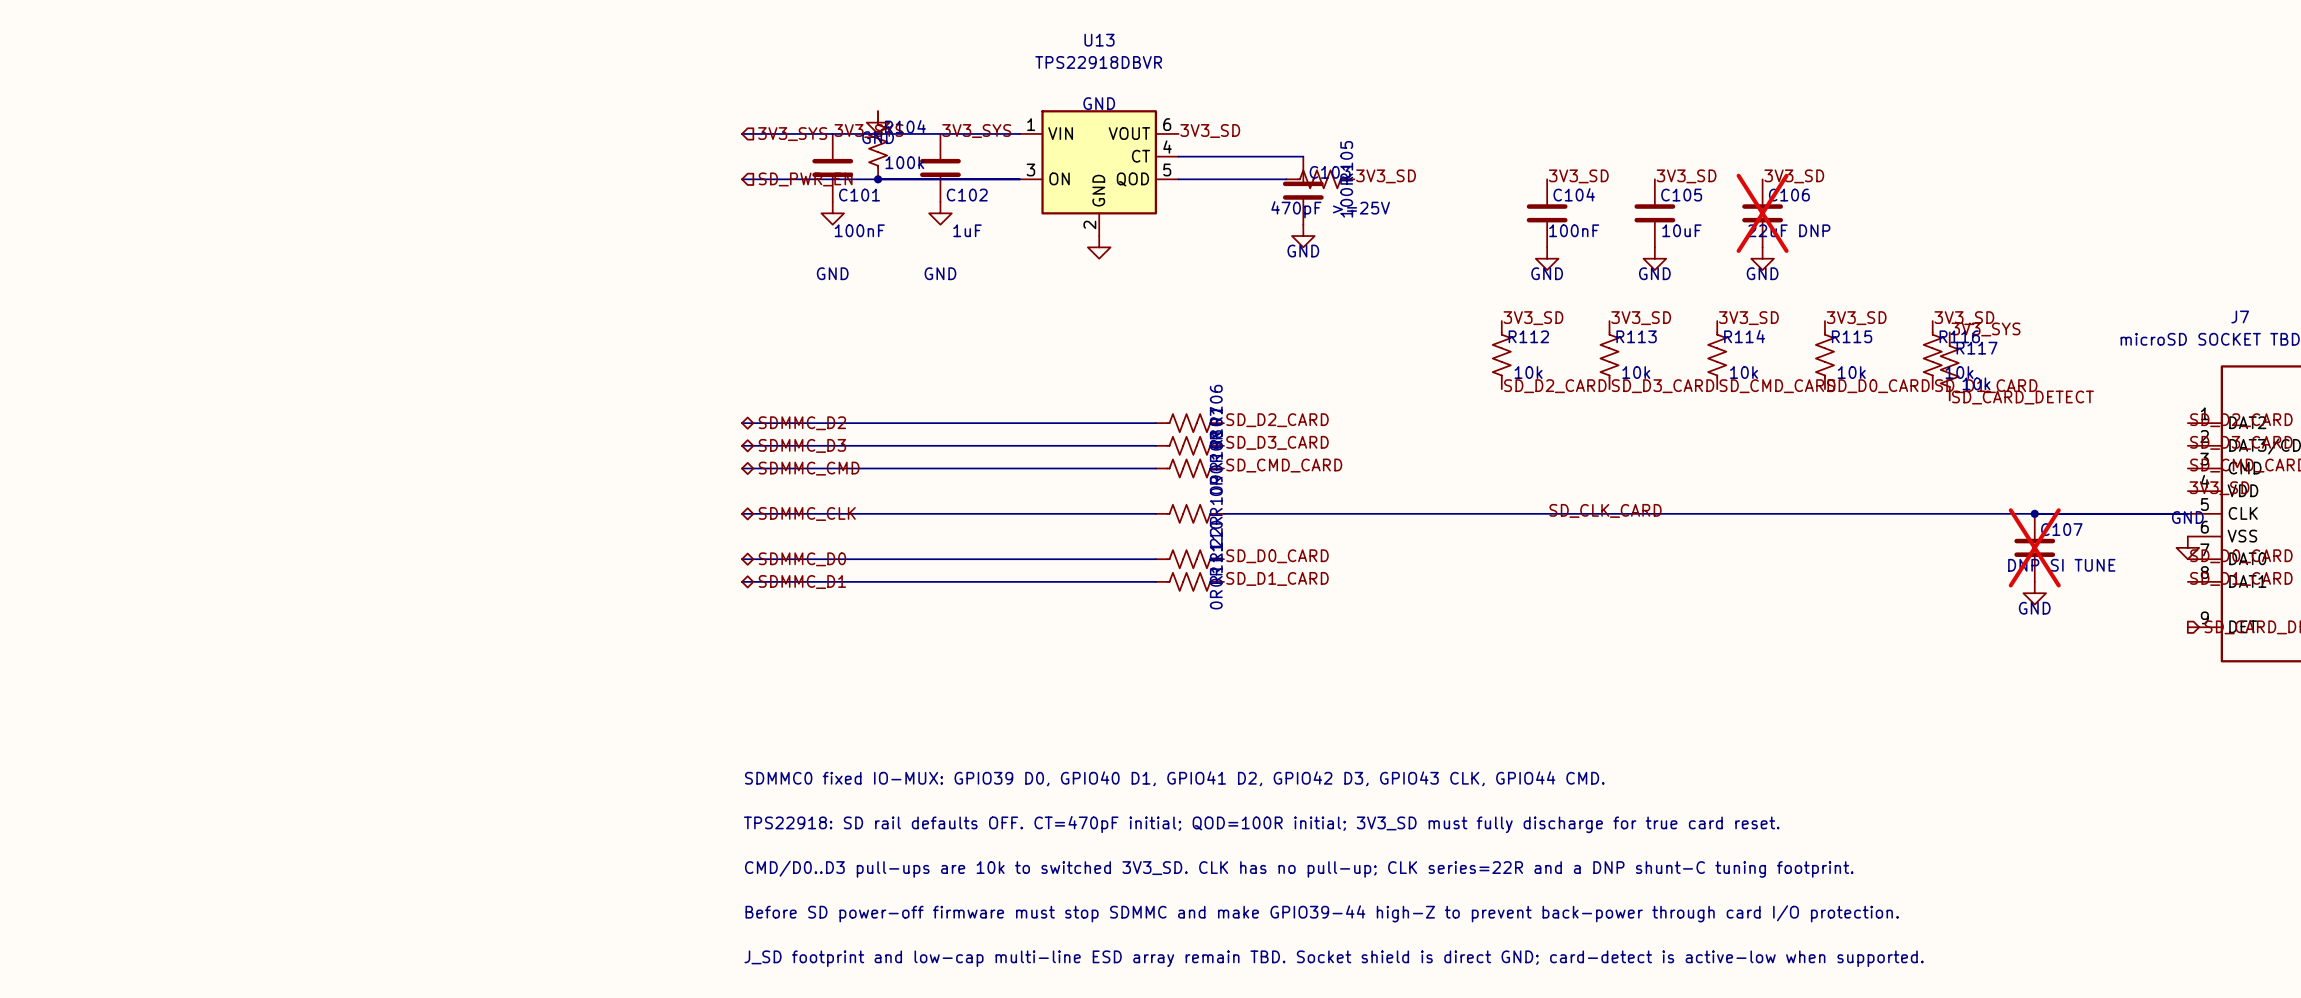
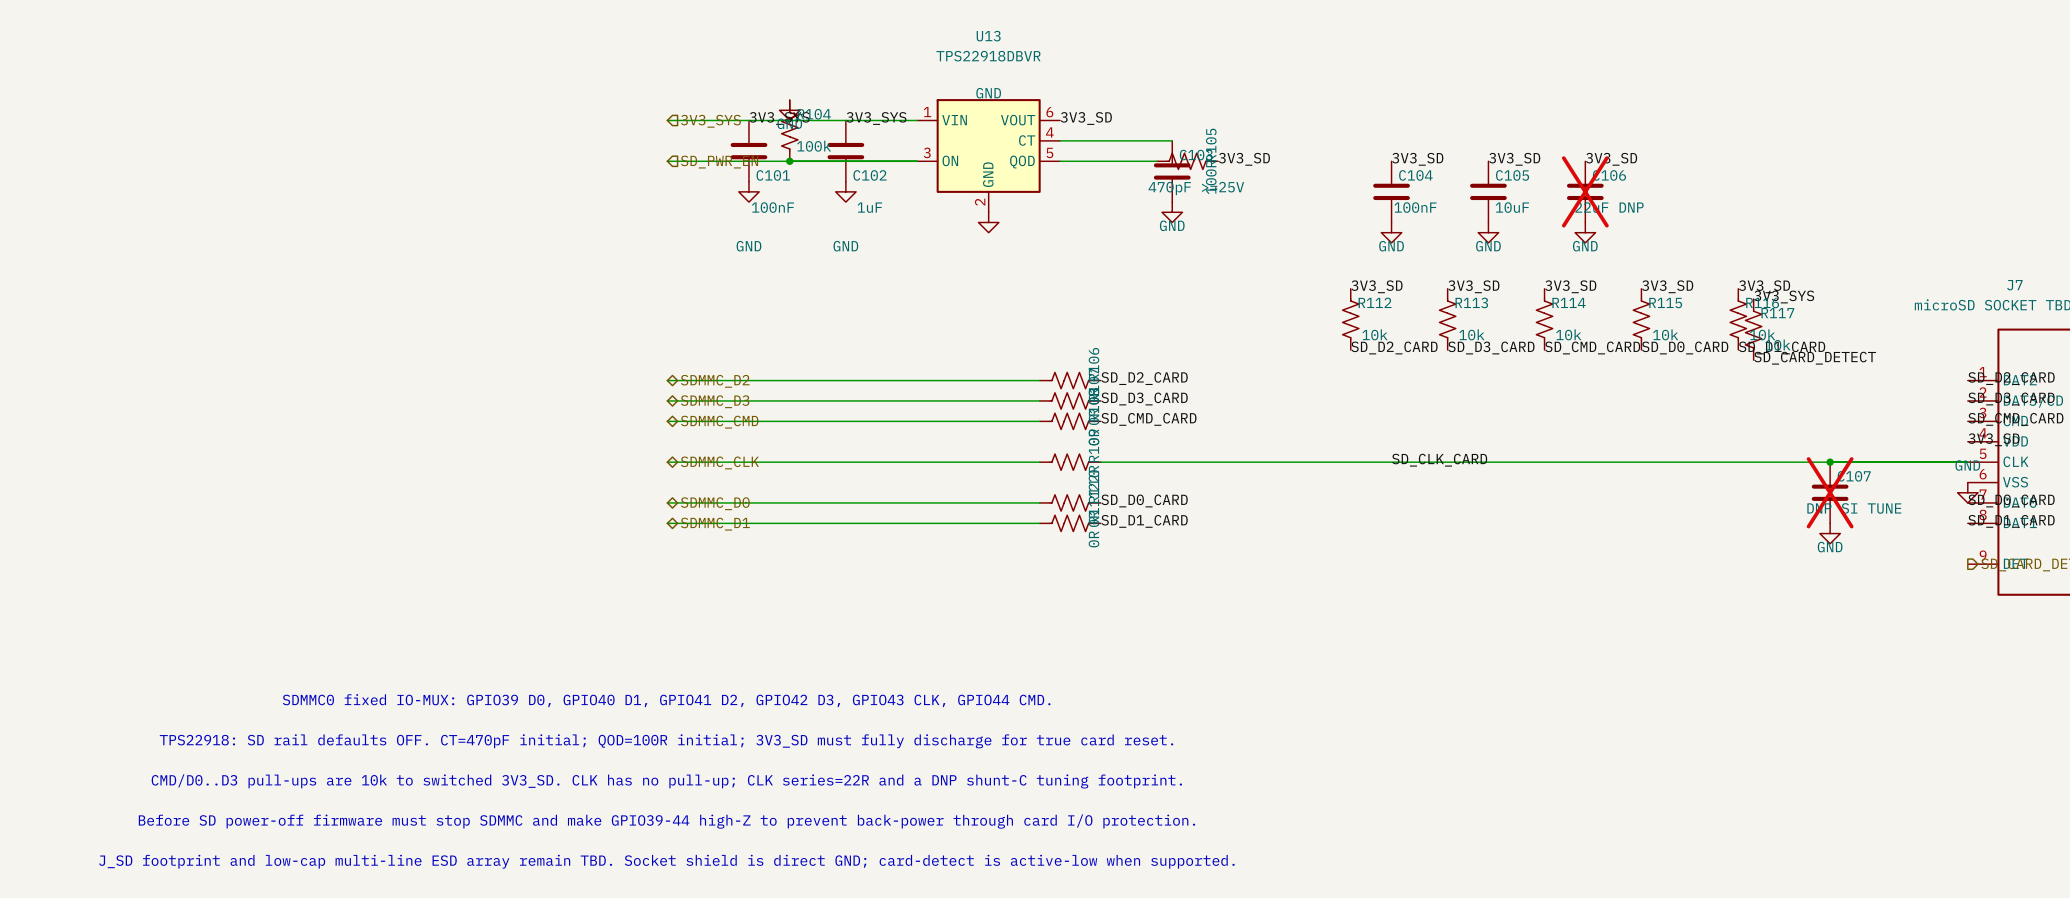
text position: SDMMC0 fixed IO-MUX: GPIO39 D0, GPIO40 D1, GPIO41 D2, GPIO42 D3, GPIO43 CLK, GPIO44 CMD. (1174, 778) -> SDMMC0 fixed IO-MUX: GPIO39 D0, GPIO40 D1, GPIO41 D2, GPIO42 D3, GPIO43 CLK, GPIO44 CMD. (666, 700)
text position: TPS22918: SD rail defaults OFF. CT=470pF initial; QOD=100R initial; 3V3_SD must fully discharge for true card reset. (1261, 824) -> TPS22918: SD rail defaults OFF. CT=470pF initial; QOD=100R initial; 3V3_SD must fully discharge for true card reset. (666, 741)
text position: CMD/D0..D3 pull-ups are 10k to switched 3V3_SD. CLK has no pull-up; CLK series=22R and a DNP shunt-C tuning footprint. (1299, 869) -> CMD/D0..D3 pull-ups are 10k to switched 3V3_SD. CLK has no pull-up; CLK series=22R and a DNP shunt-C tuning footprint. (666, 781)
text position: Before SD power-off firmware must stop SDMMC and make GPIO39-44 high-Z to prevent back-power through card I/O protection. (1322, 913) -> Before SD power-off firmware must stop SDMMC and make GPIO39-44 high-Z to prevent back-power through card I/O protection. (666, 821)
text position: J_SD footprint and low-cap multi-line ESD array remain TBD. Socket shield is direct GND; card-detect is active-low when supported. (1334, 958) -> J_SD footprint and low-cap multi-line ESD array remain TBD. Socket shield is direct GND; card-detect is active-low when supported. (666, 861)

